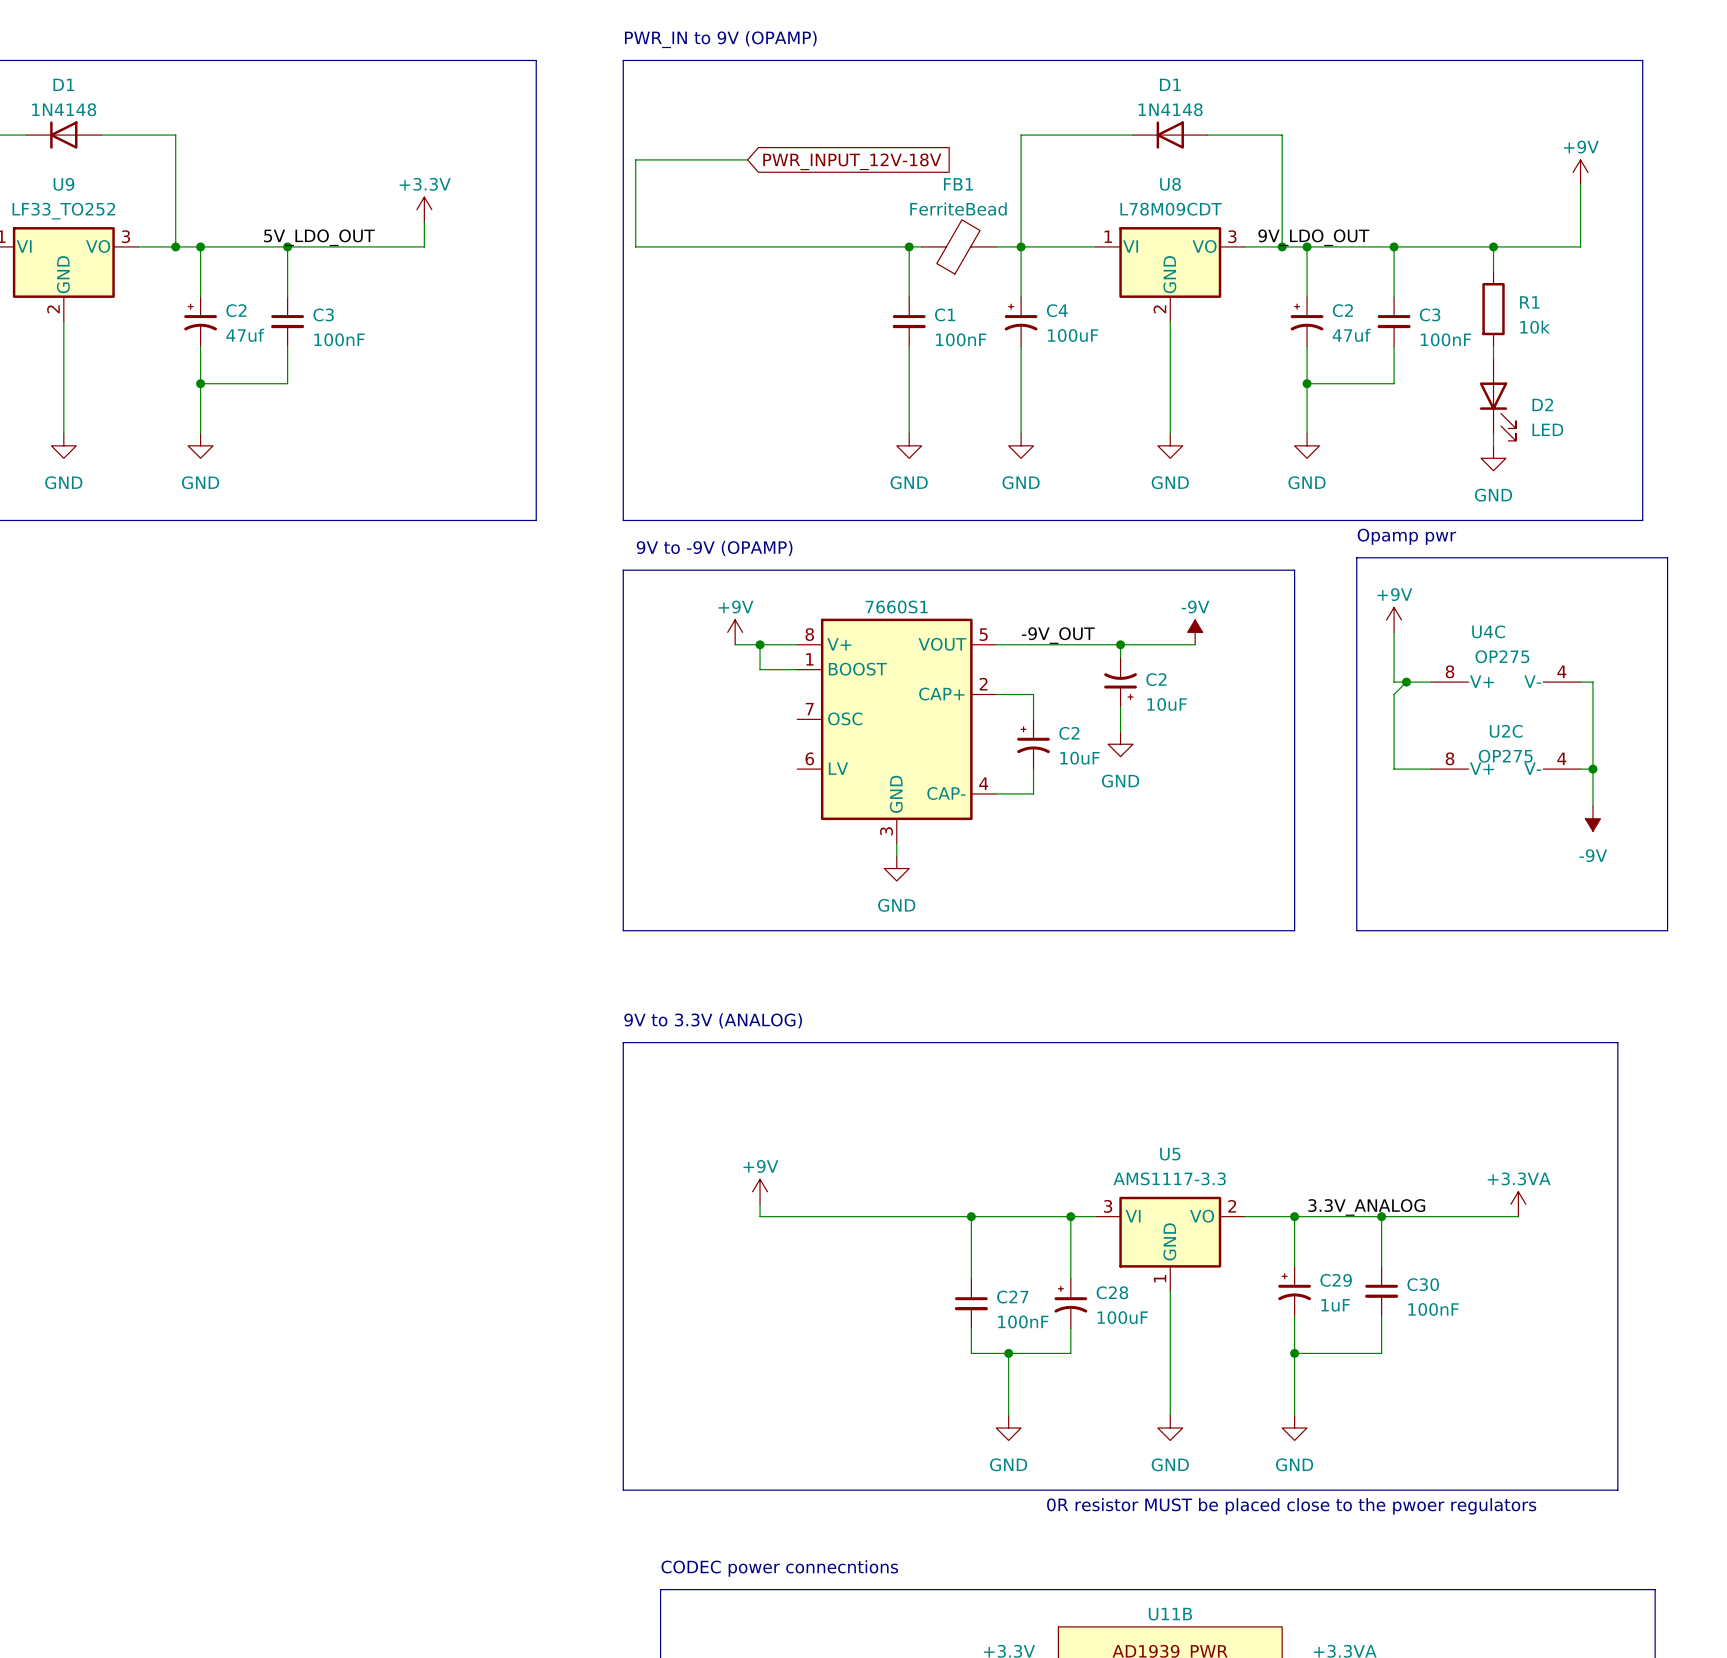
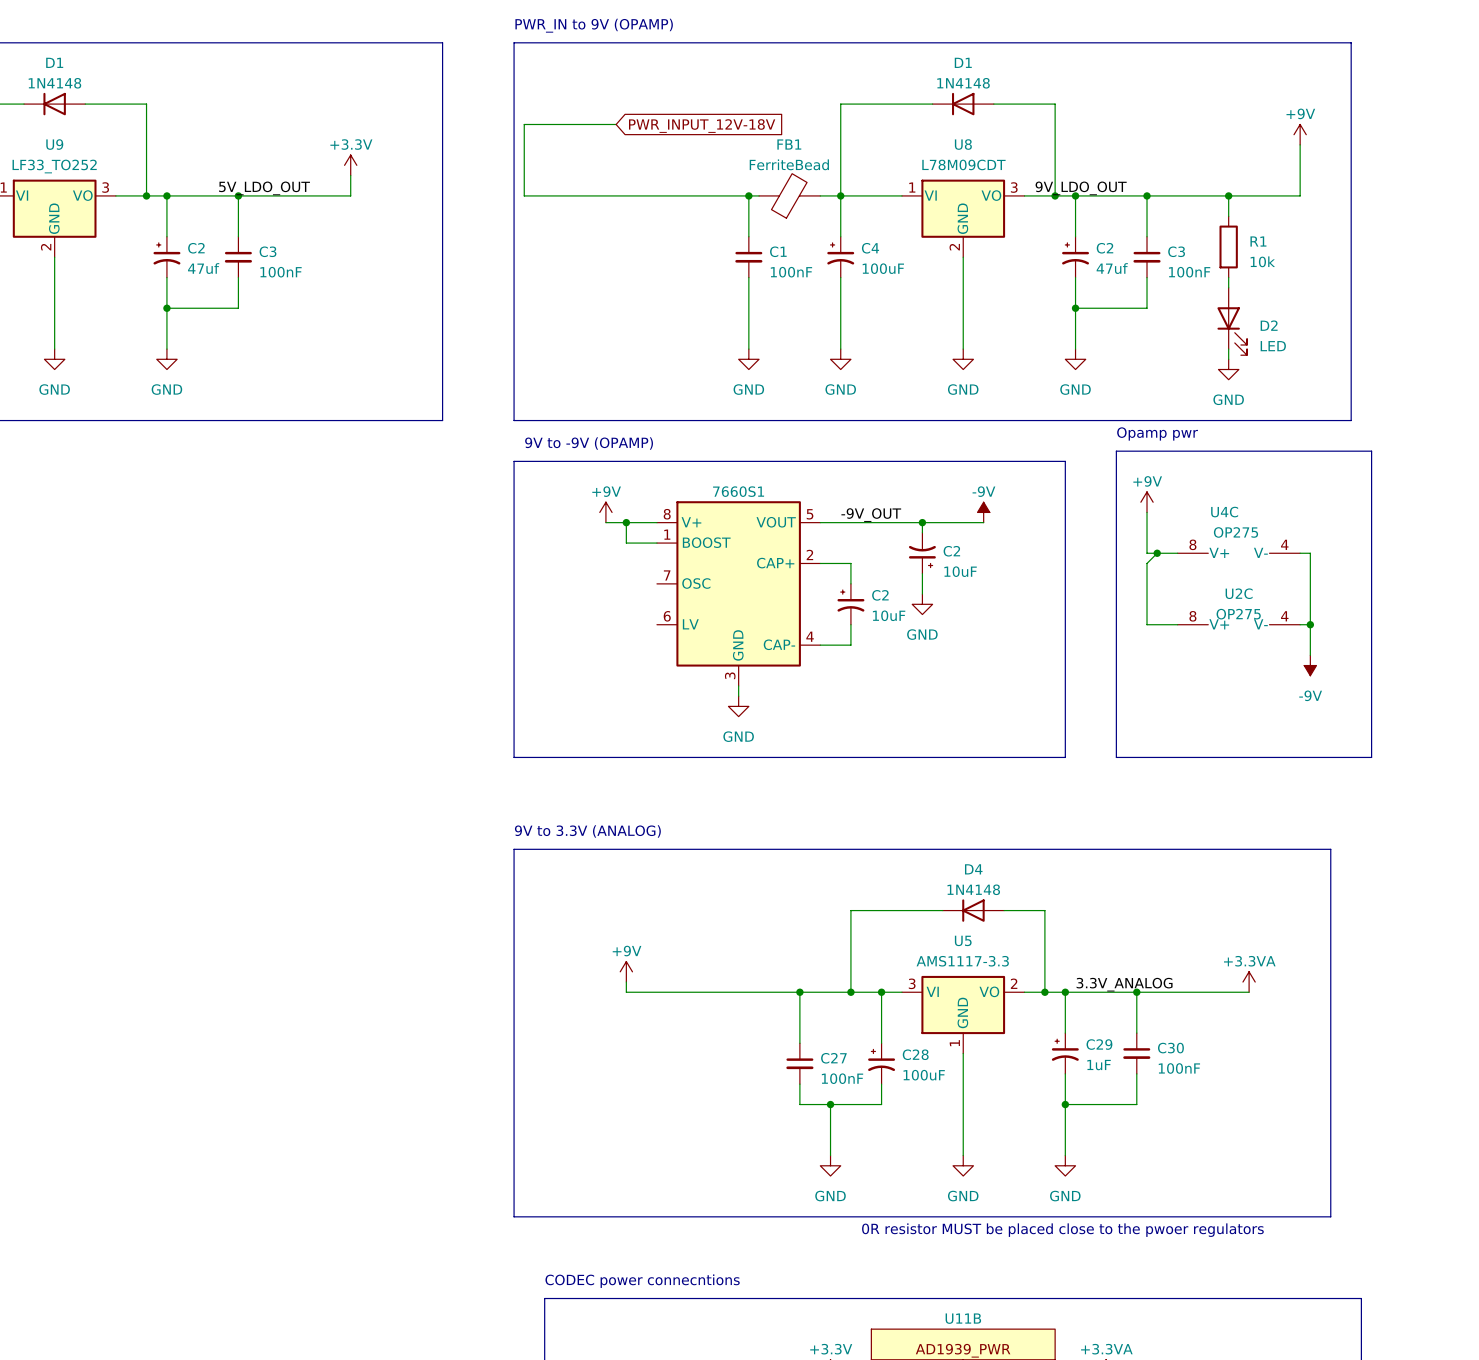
wire: none -> (942, 910) (850, 910) (850, 992)
D4: none -> 1N4148 (973, 910)
wire: none -> (1004, 910) (1044, 910) (1044, 992)
junction: none -> (850, 992)
junction: none -> (1044, 992)

